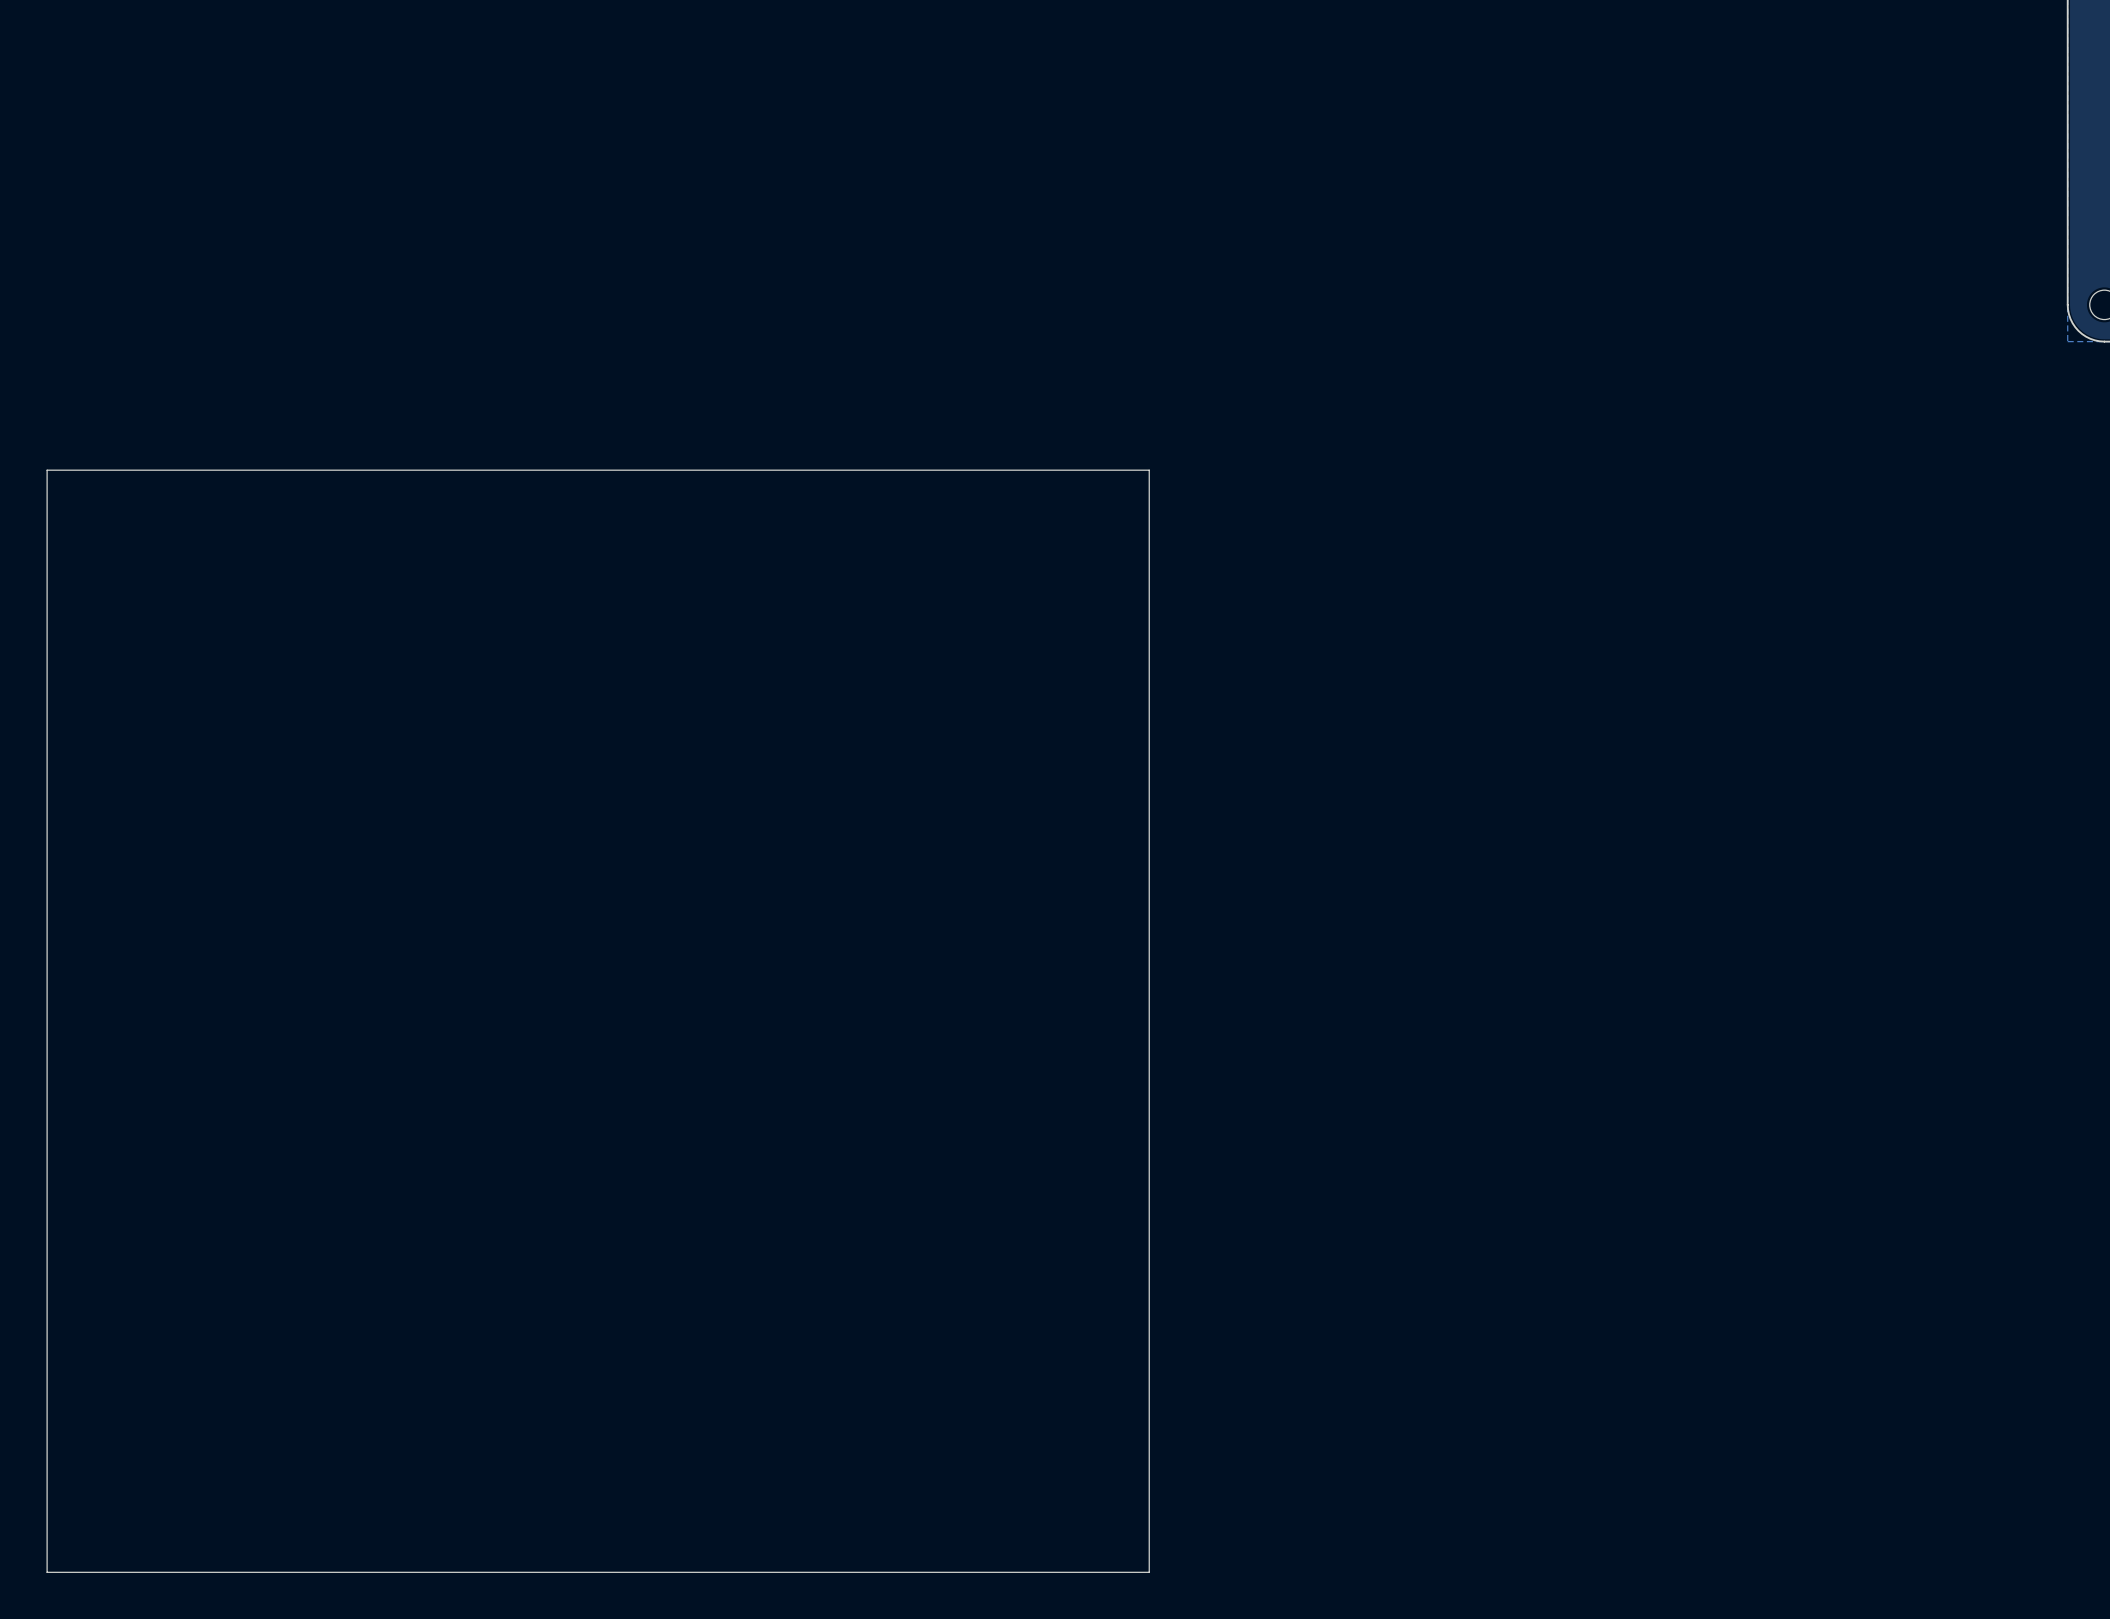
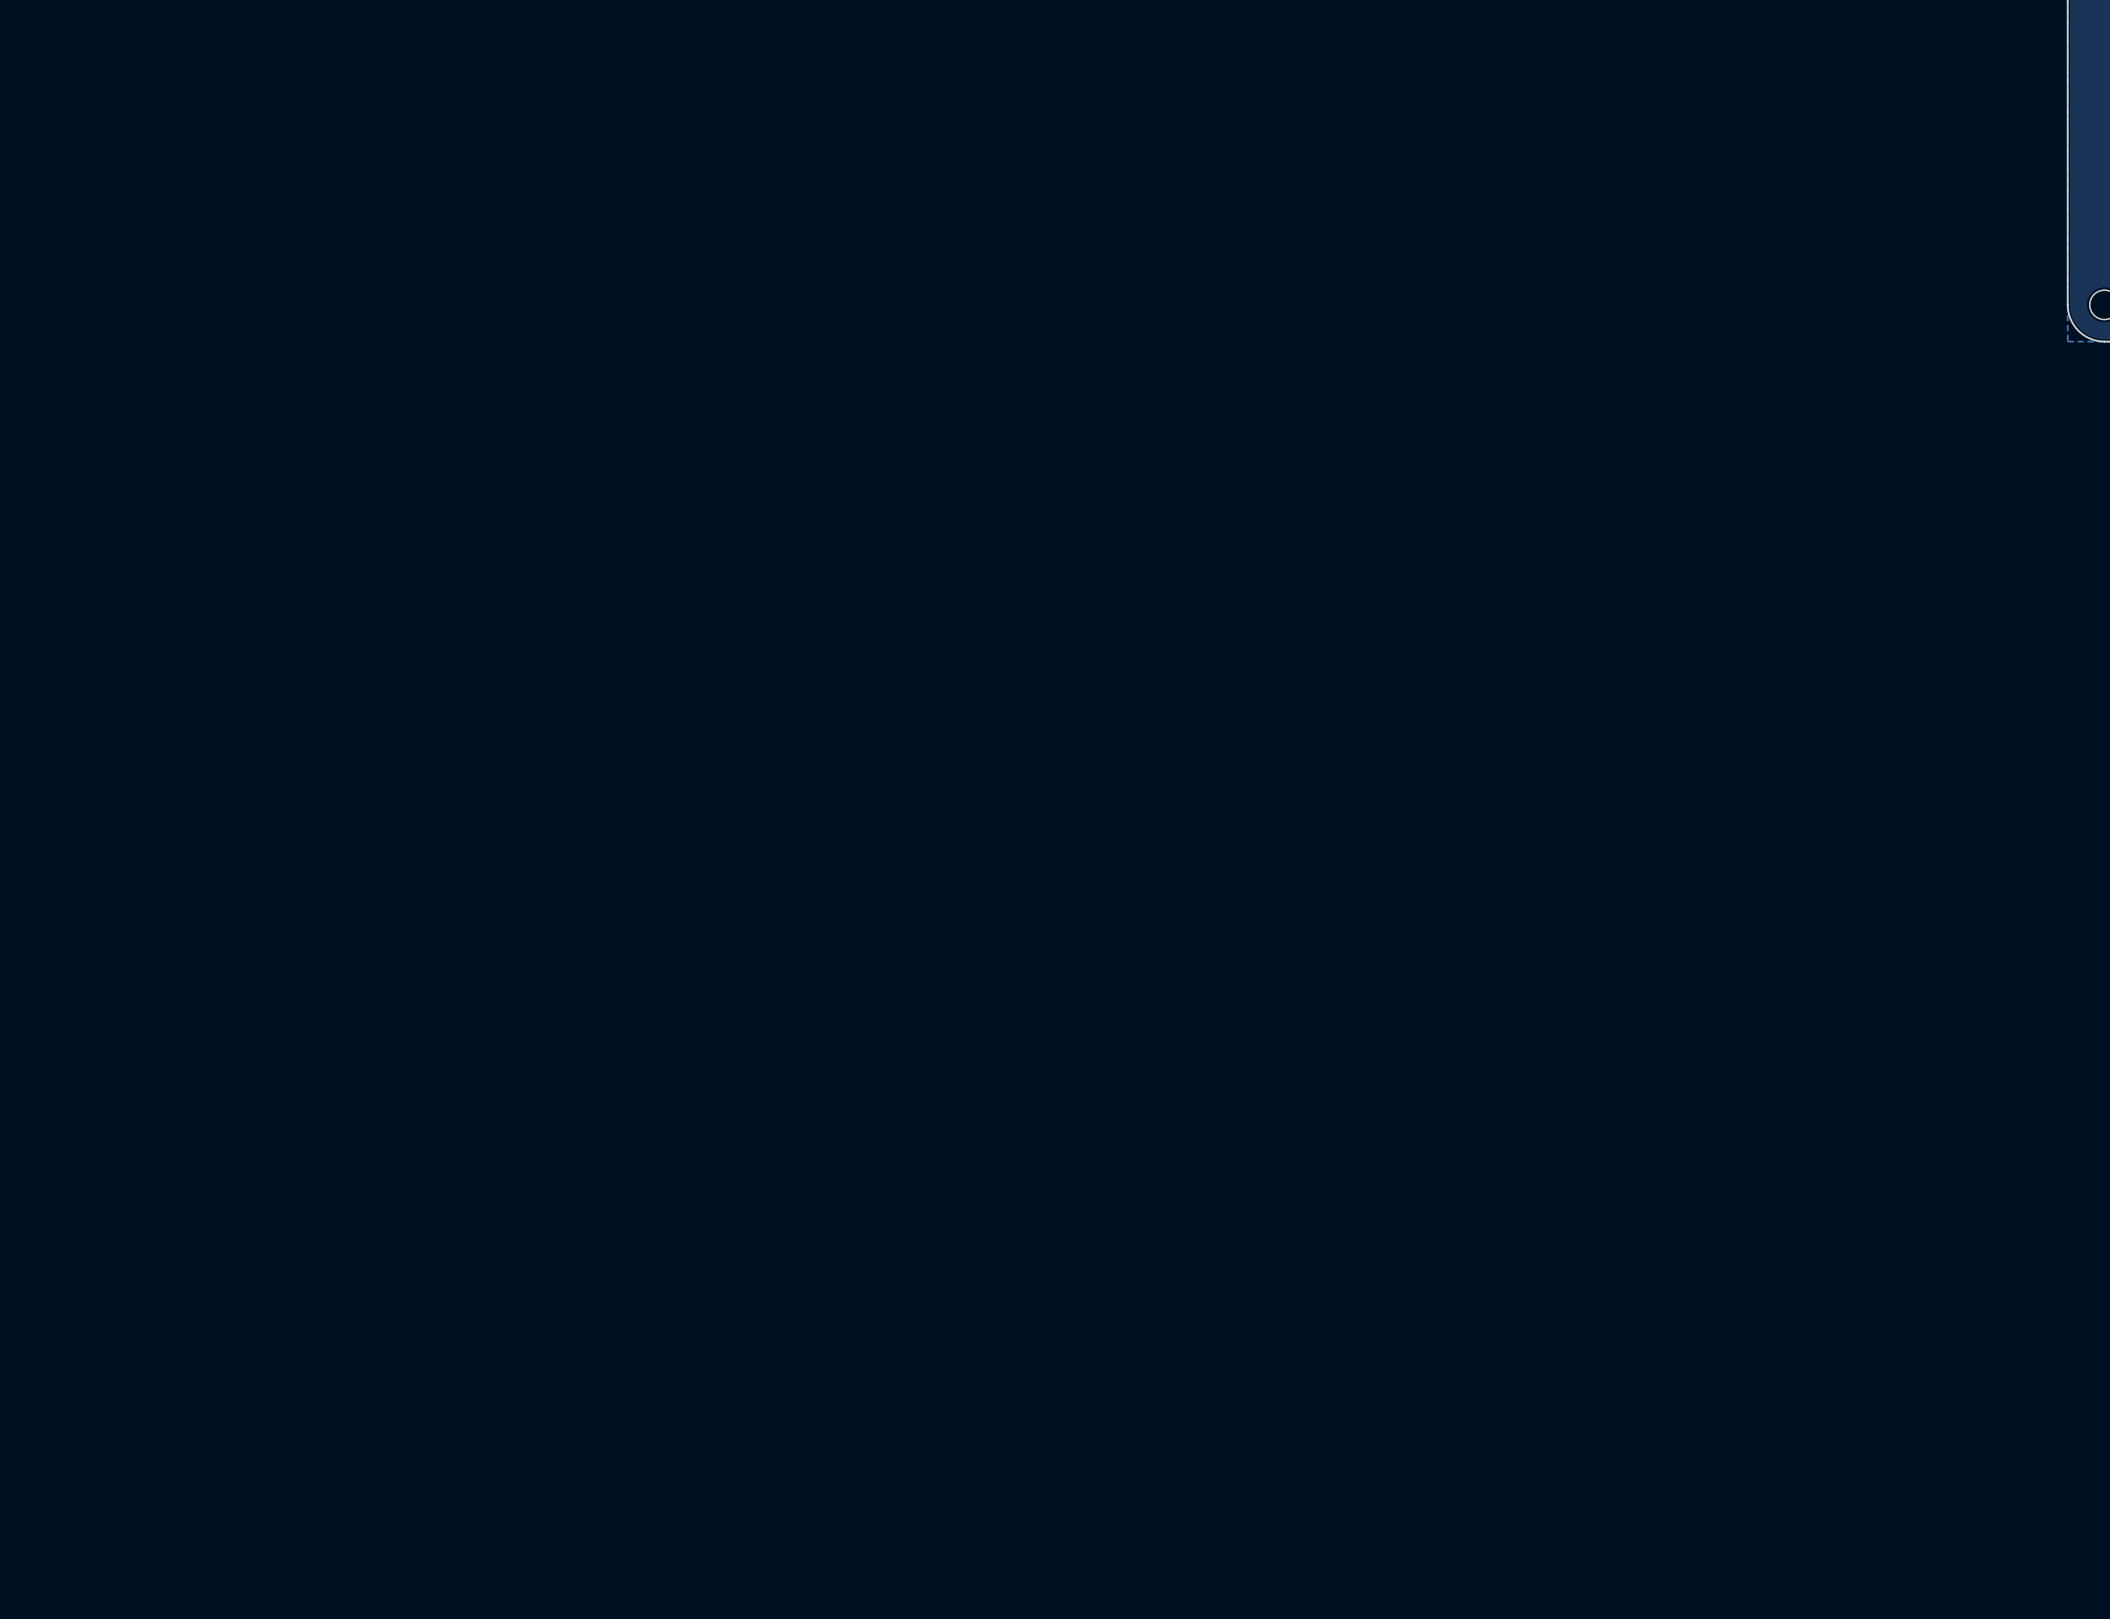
board edge: (1149, 470) (47, 470) (47, 1572) (1149, 1572) (1149, 470) -> none

